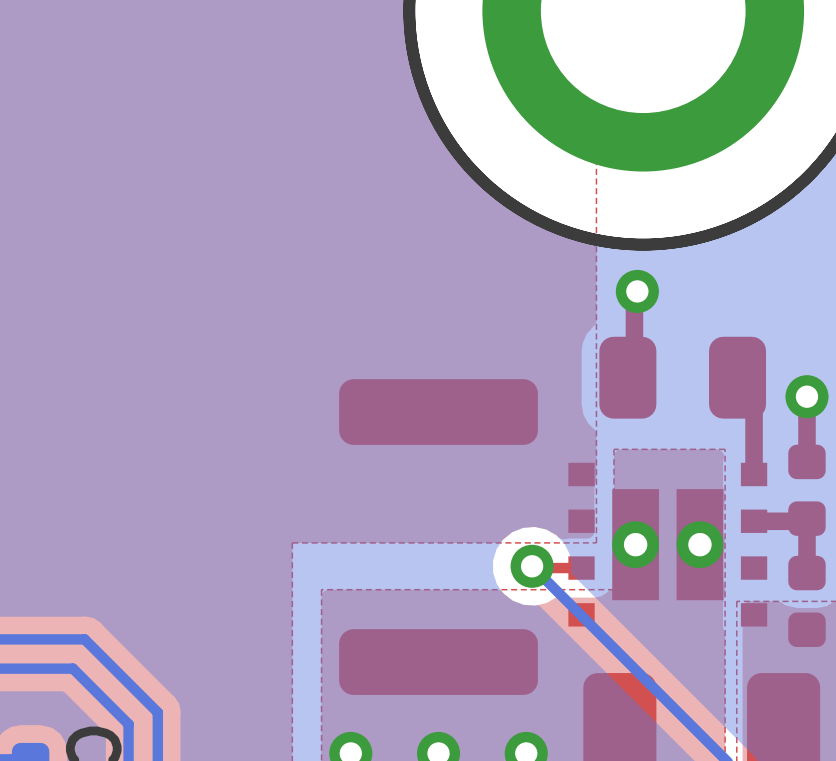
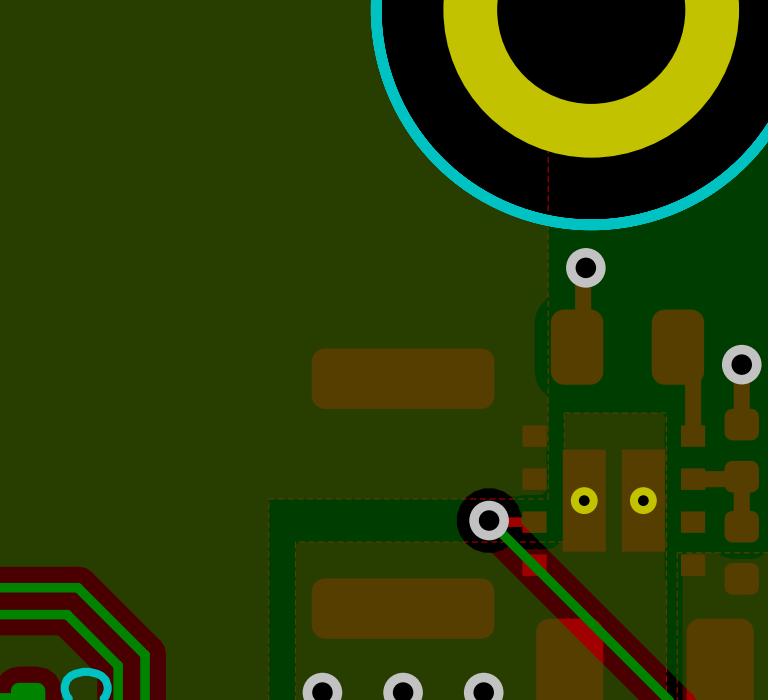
part footprint: [568, 462, 768, 627] -> [522, 425, 706, 576]

